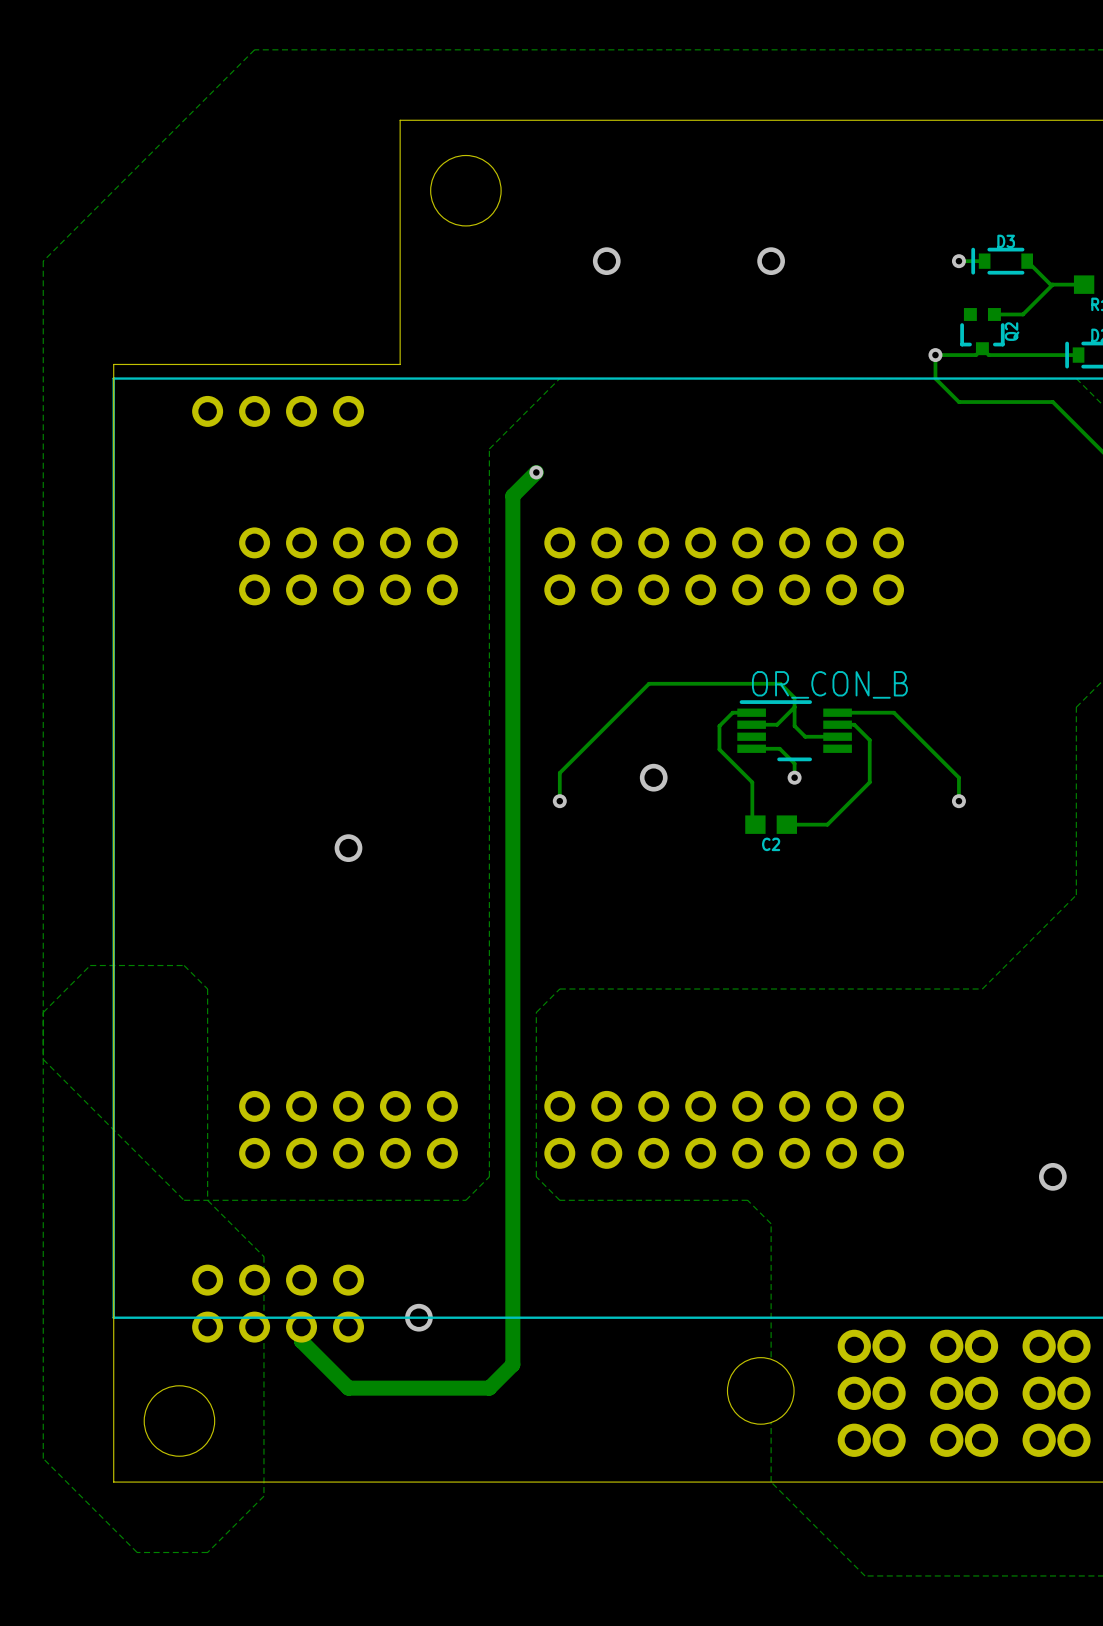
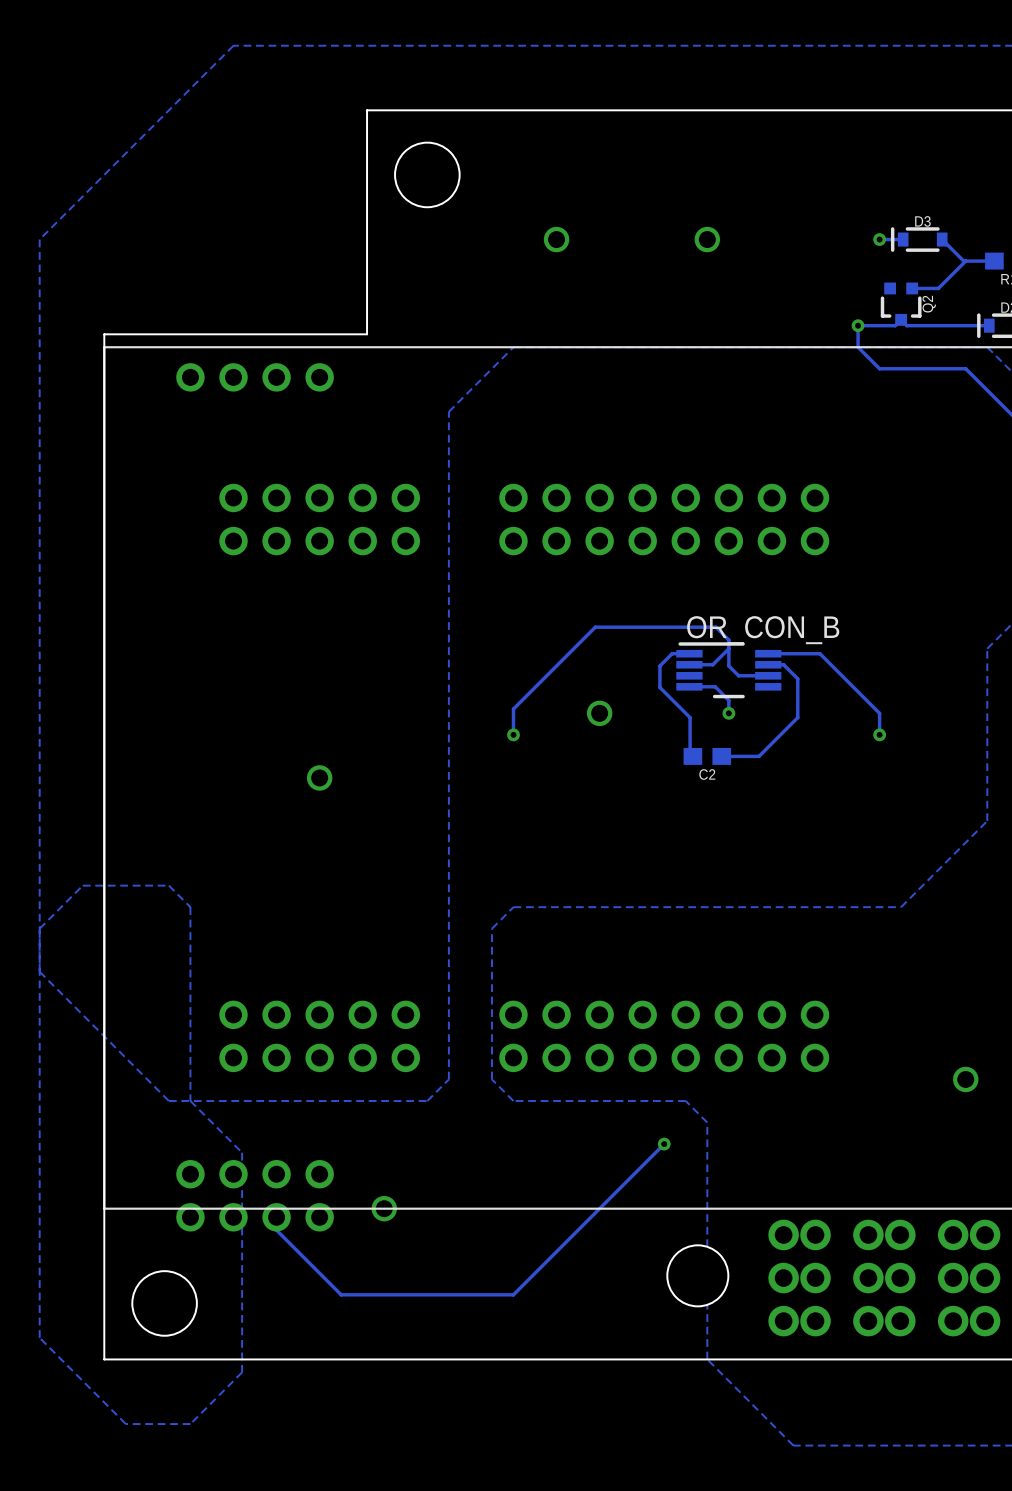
track: (536, 472) (512, 495) (512, 1364) (489, 1388) (348, 1388) -> (664, 1144) (513, 1294) (341, 1294) (319, 1273)
via: (536, 472) -> none
via: none -> (664, 1144)
track width: thick (301, 1327) (301, 1341) (348, 1388) -> thin (276, 1217) (276, 1230) (319, 1273)

